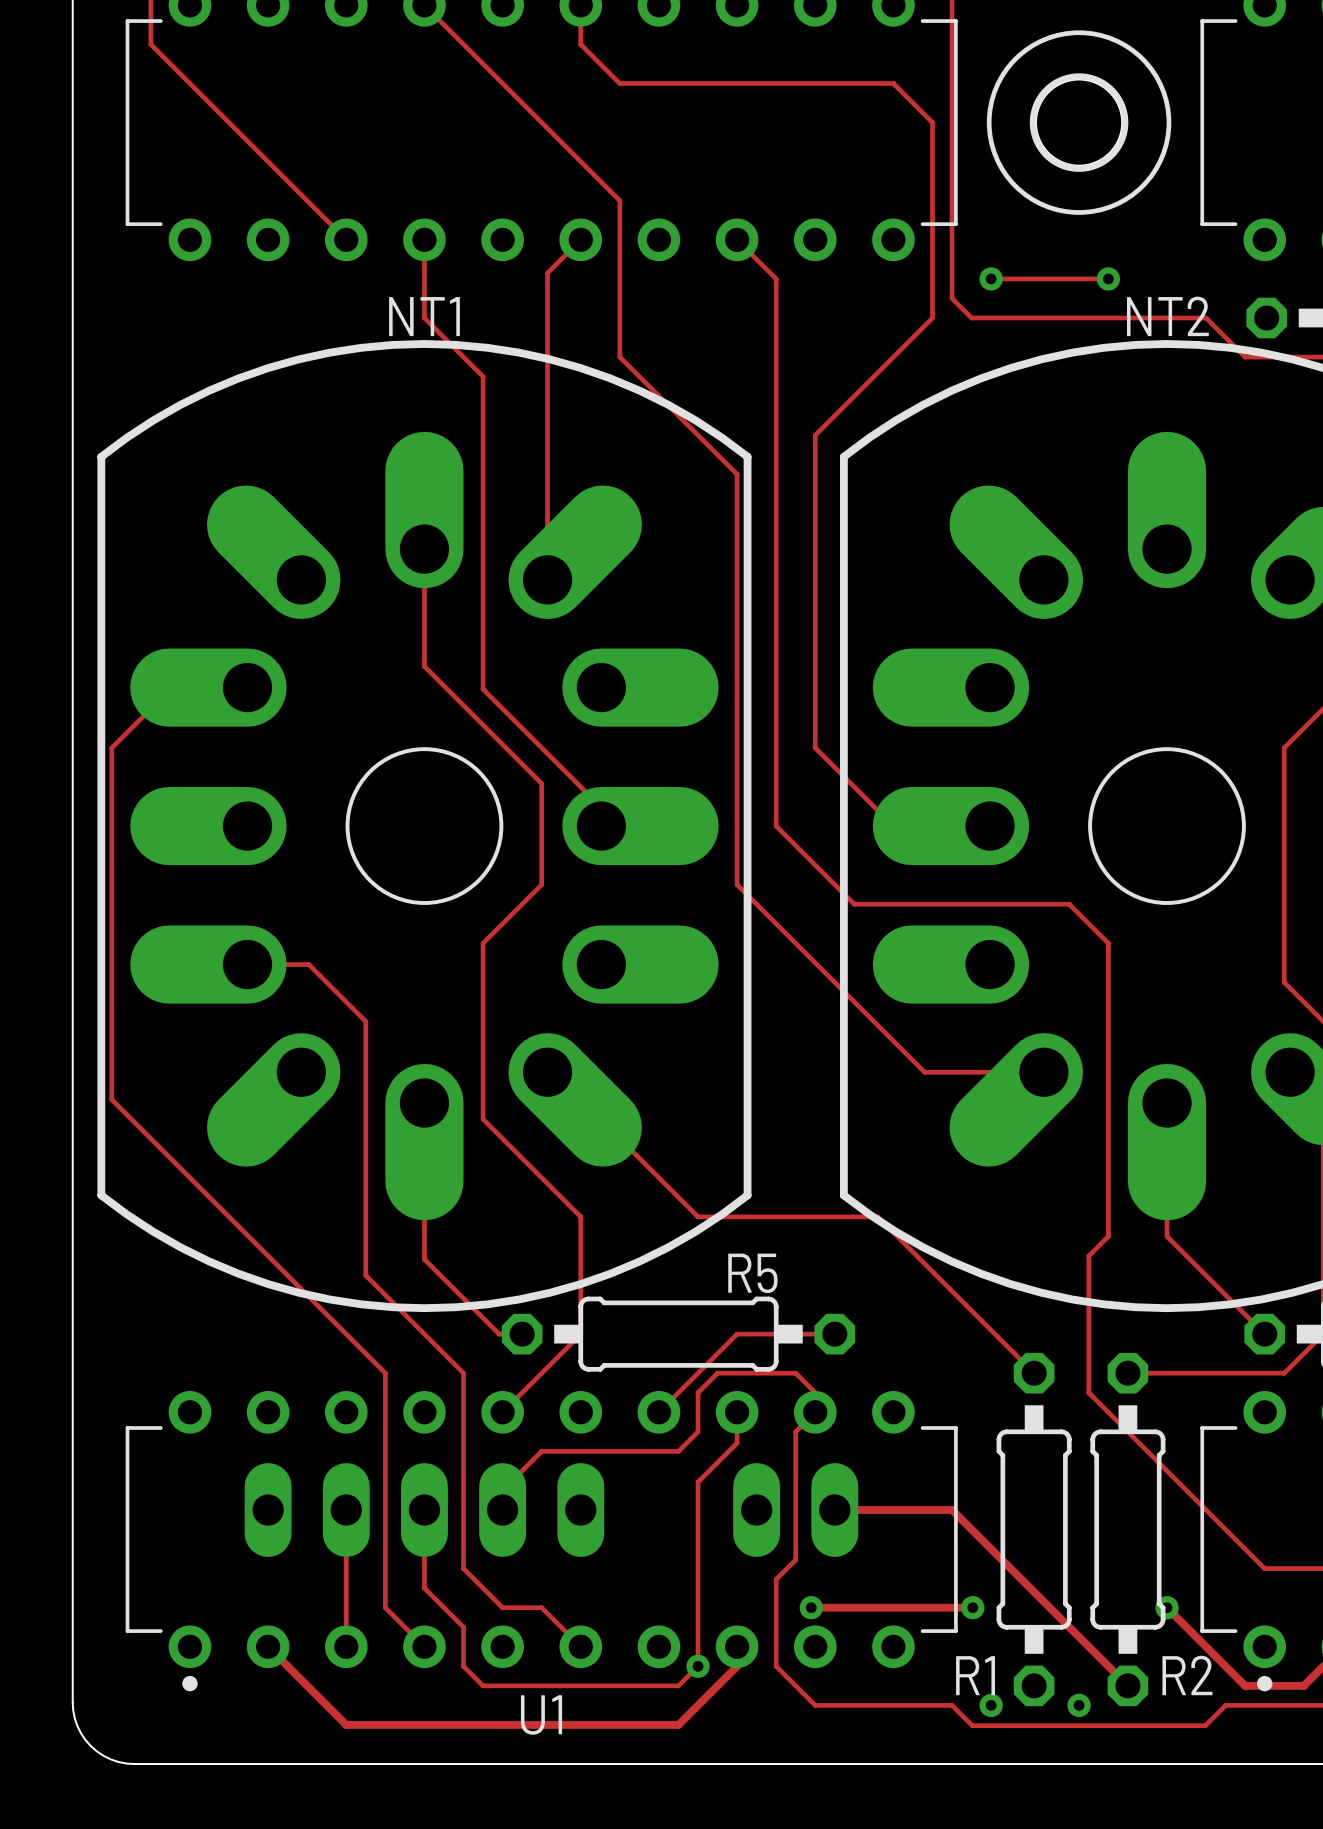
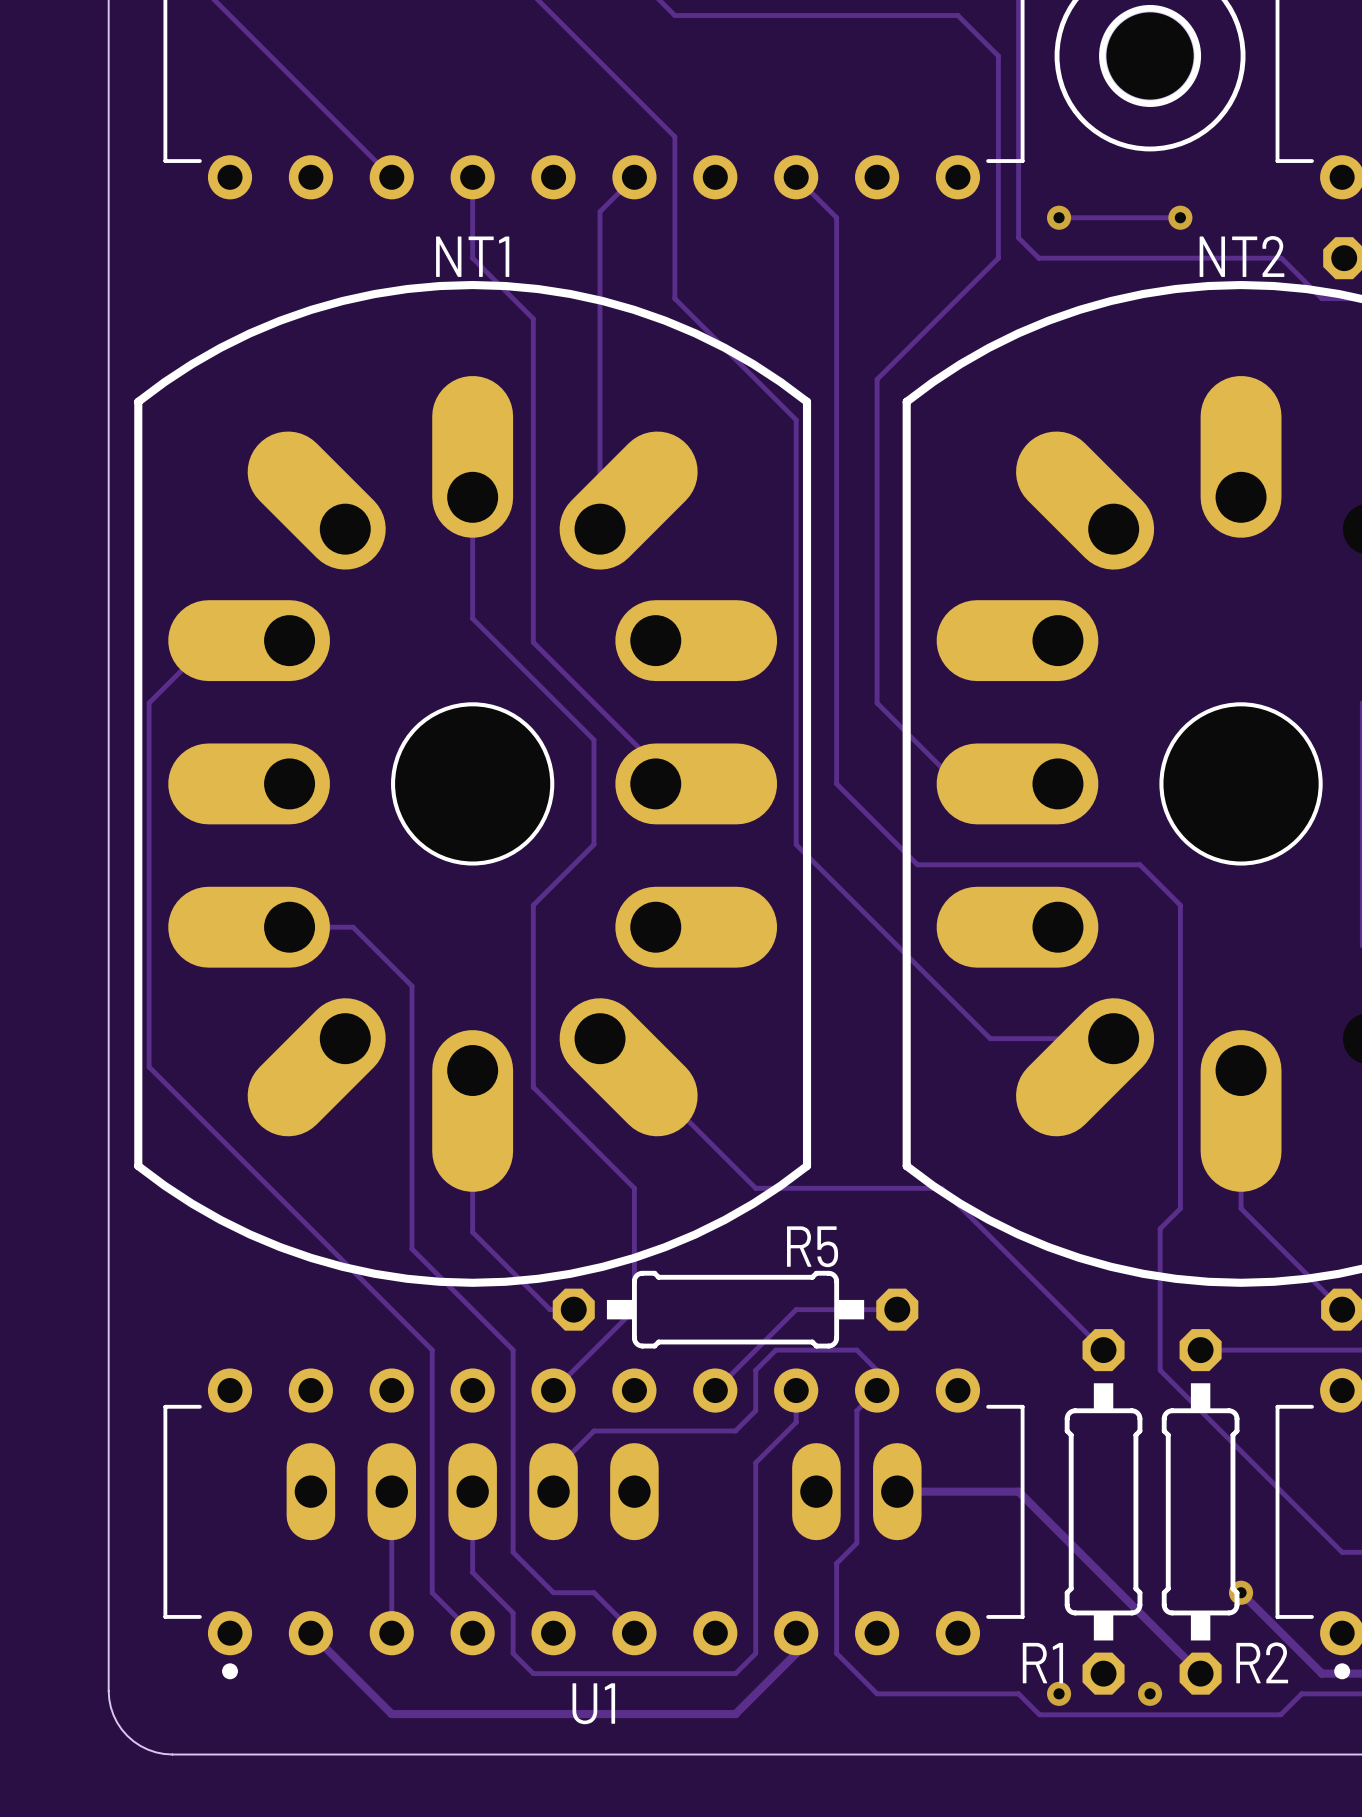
track: (811, 1607) (972, 1607) -> none
via: (811, 1607) -> none
via: (972, 1607) -> none
via: (698, 1666) -> none

